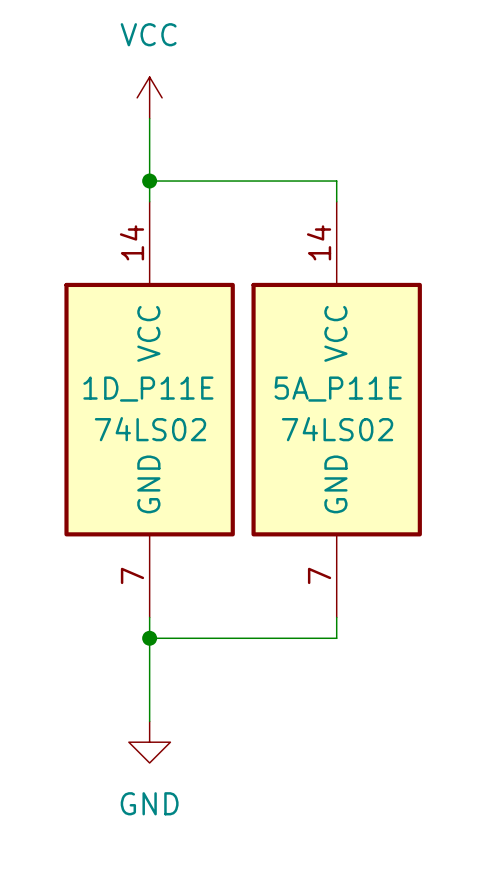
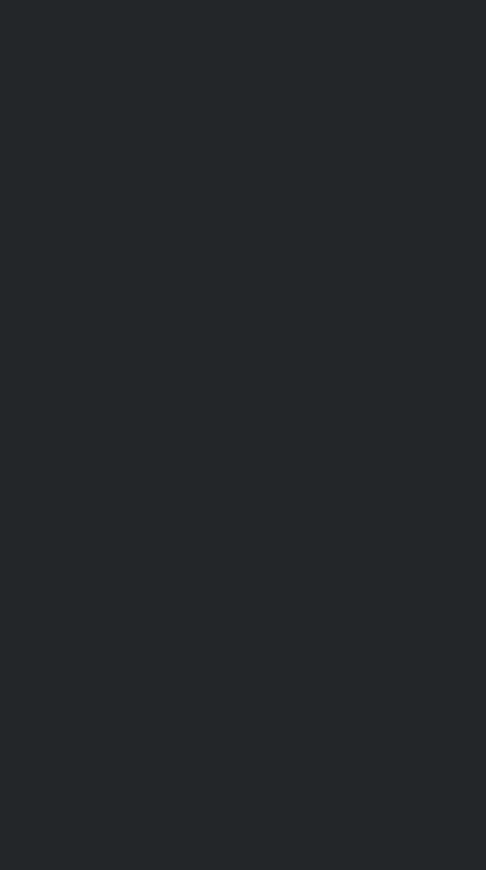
power symbol: VCC (149, 97) -> none
wire: (149, 118) (149, 201) -> none
wire: (149, 181) (336, 181) (336, 201) -> none
junction: (149, 181) -> none
1D_P11E: 74LS02 (149, 409) -> none
5A_P11E: 74LS02 (336, 409) -> none
wire: (149, 617) (149, 721) -> none
wire: (336, 617) (336, 638) (149, 638) -> none
junction: (149, 638) -> none
power symbol: GND (149, 742) -> none

